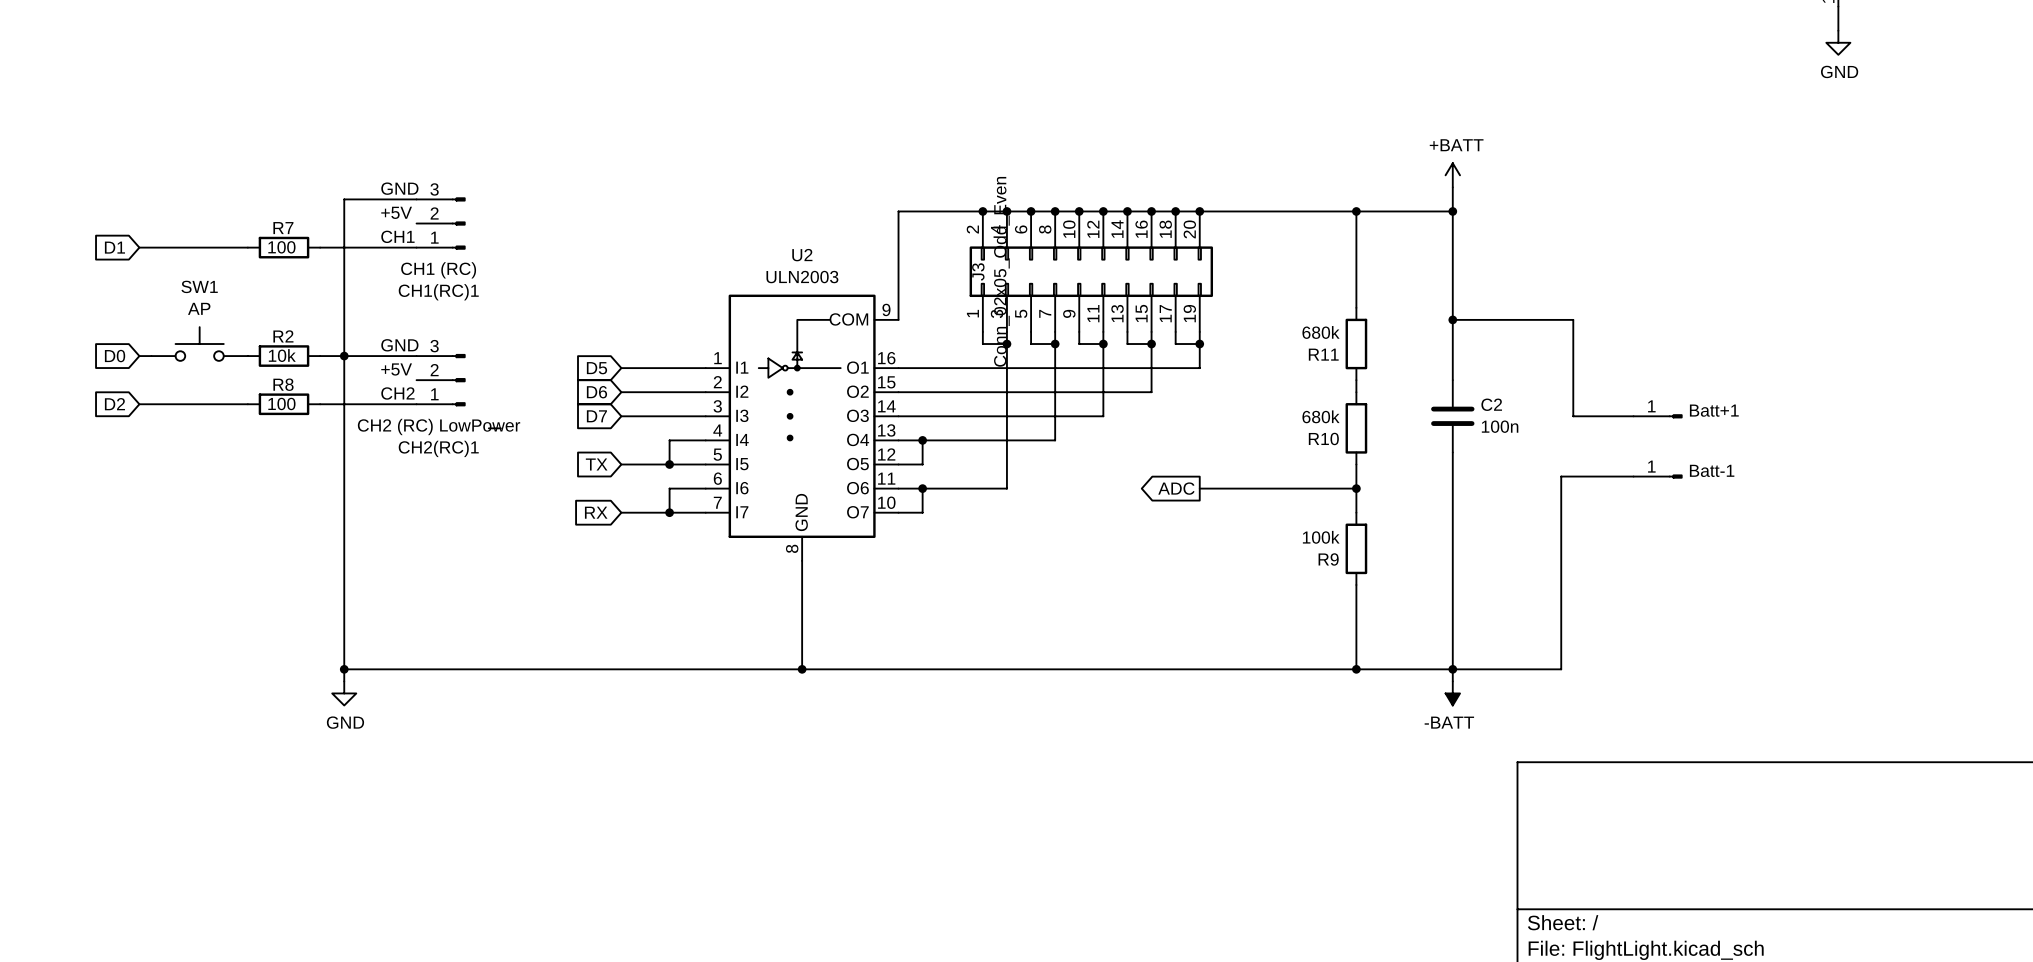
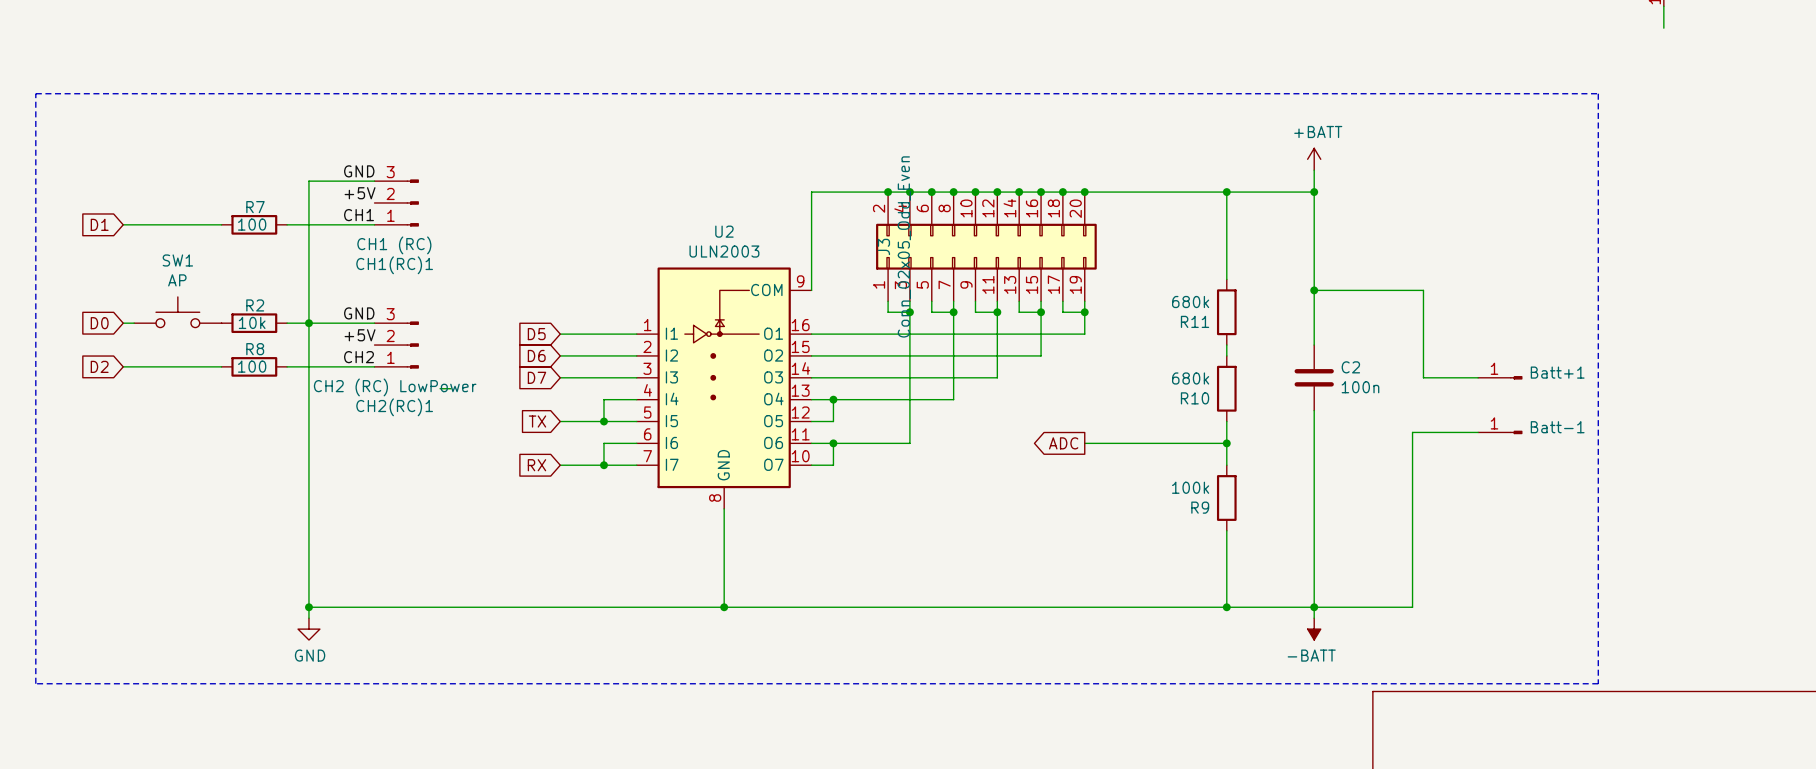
power symbol: GND (1838, 42) -> none
line: none -> (35, 93) (1598, 93) (1598, 683) (35, 683) (35, 93)

